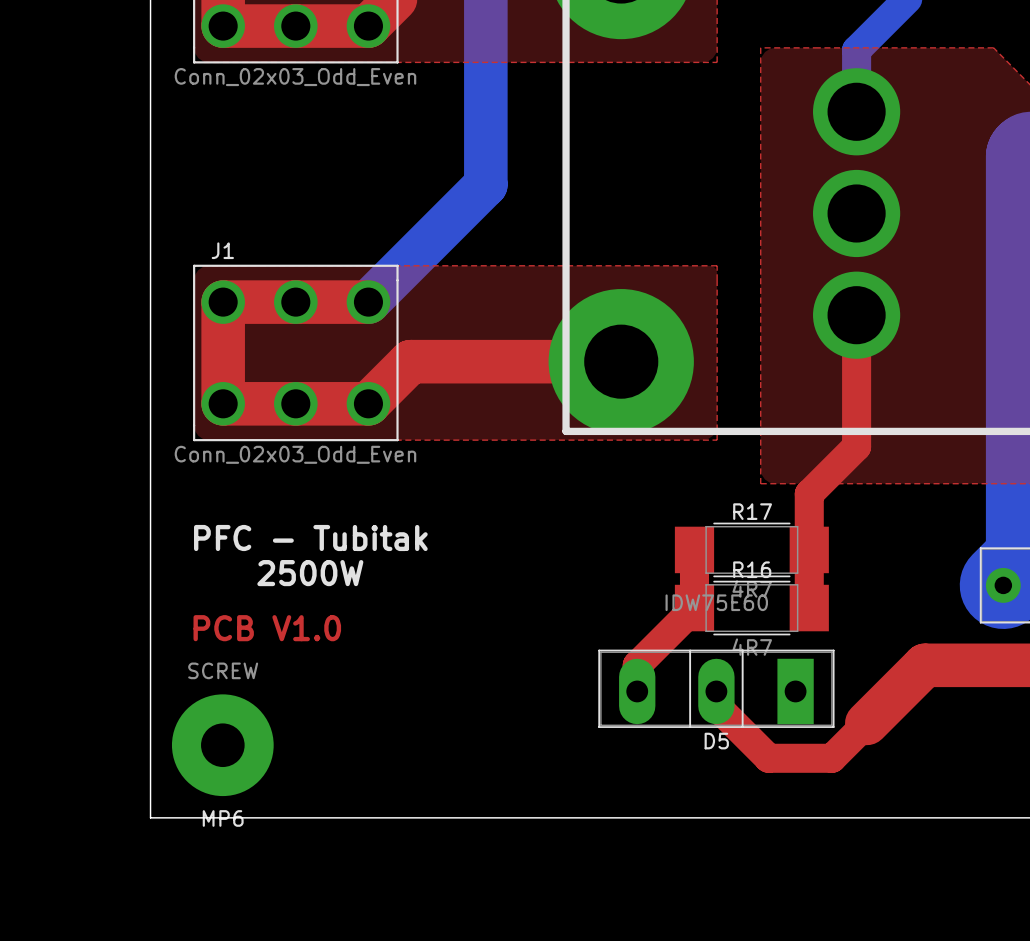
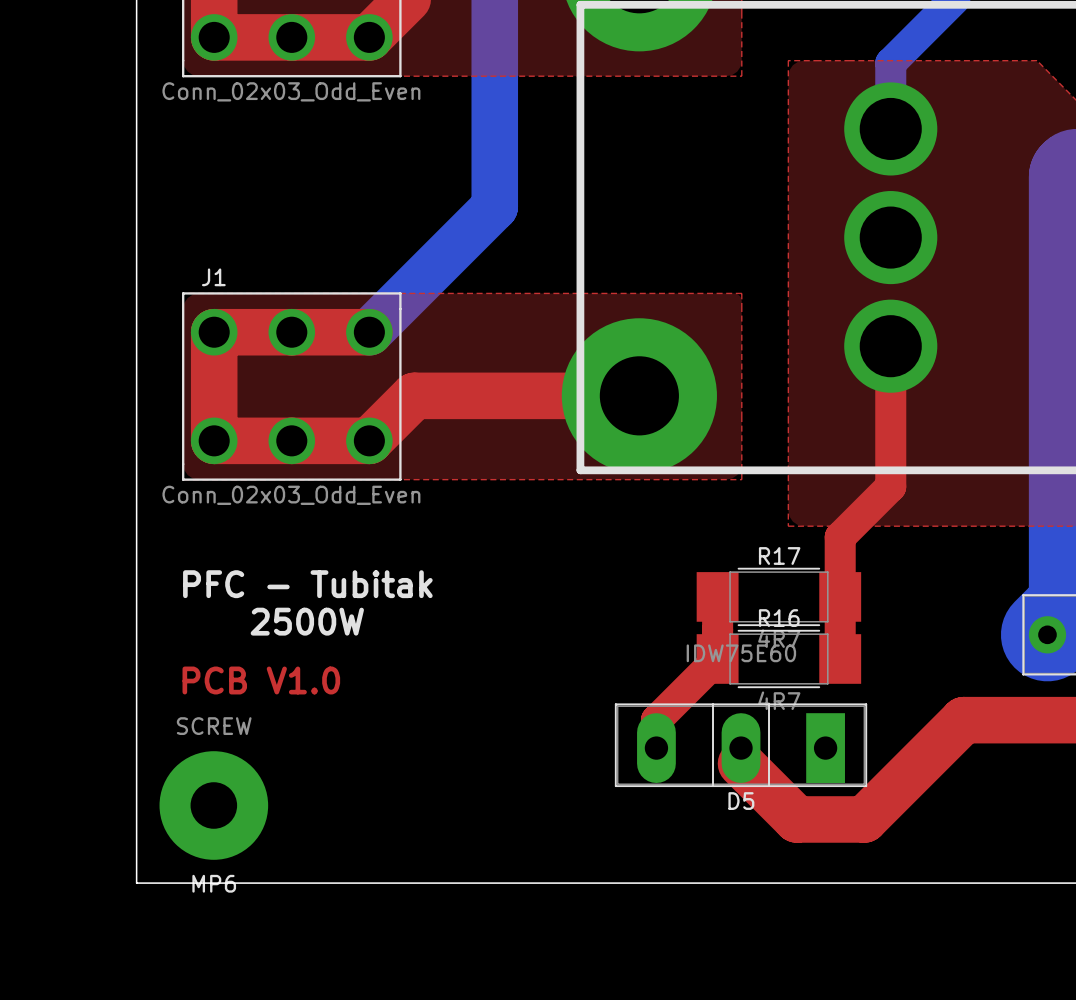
top track width: thin (716, 705) (768, 758) (831, 758) (866, 723) -> thick (741, 763) (796, 819) (864, 819) (901, 782)

